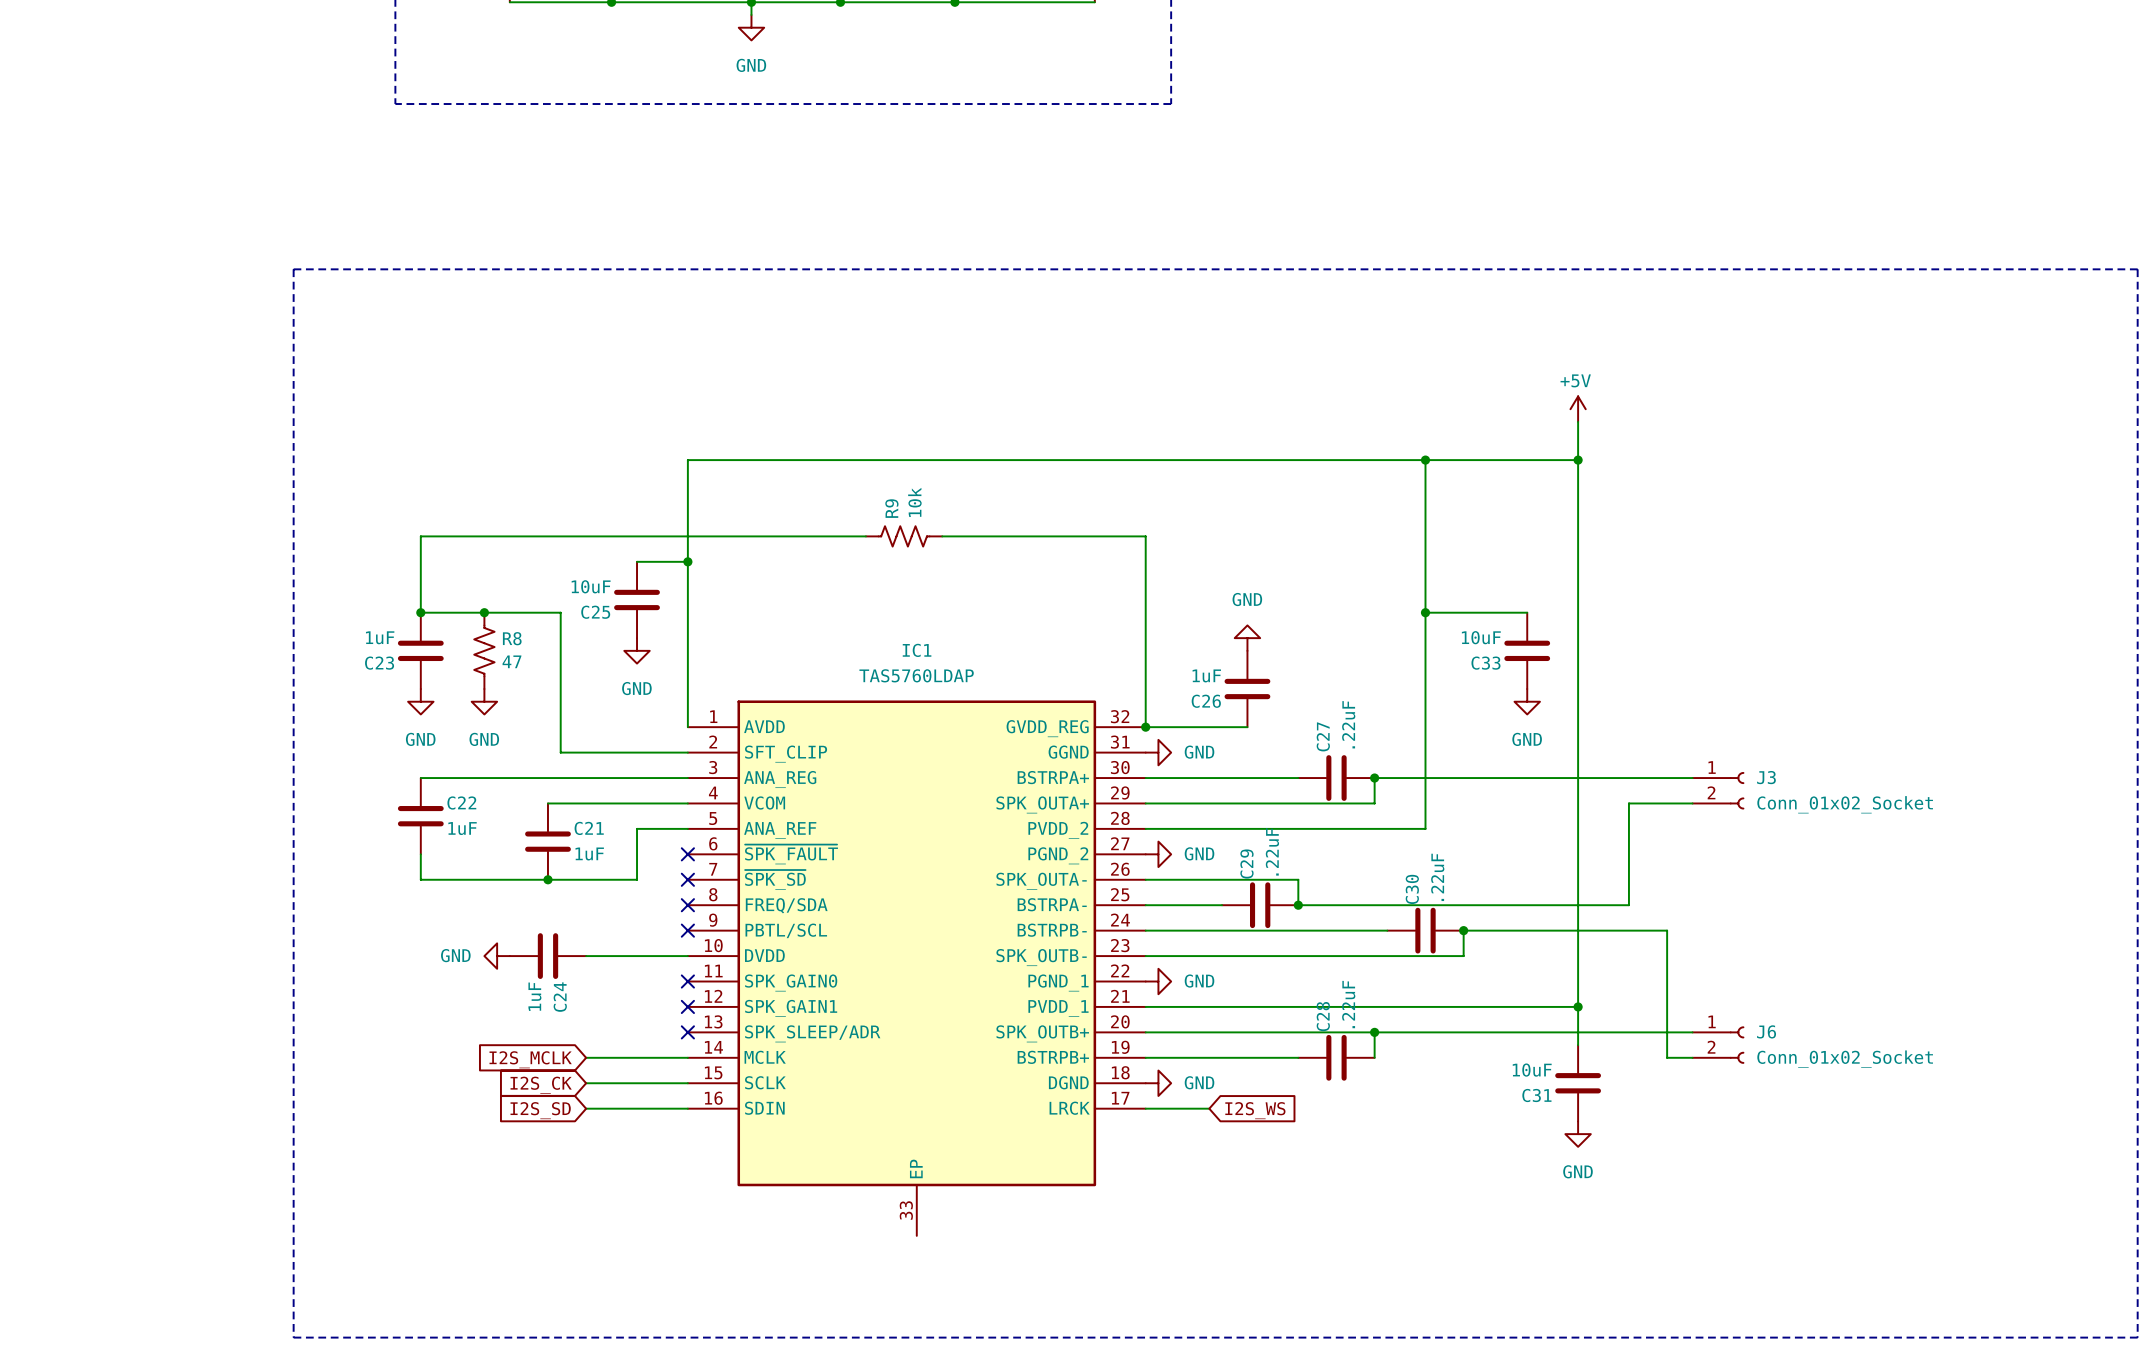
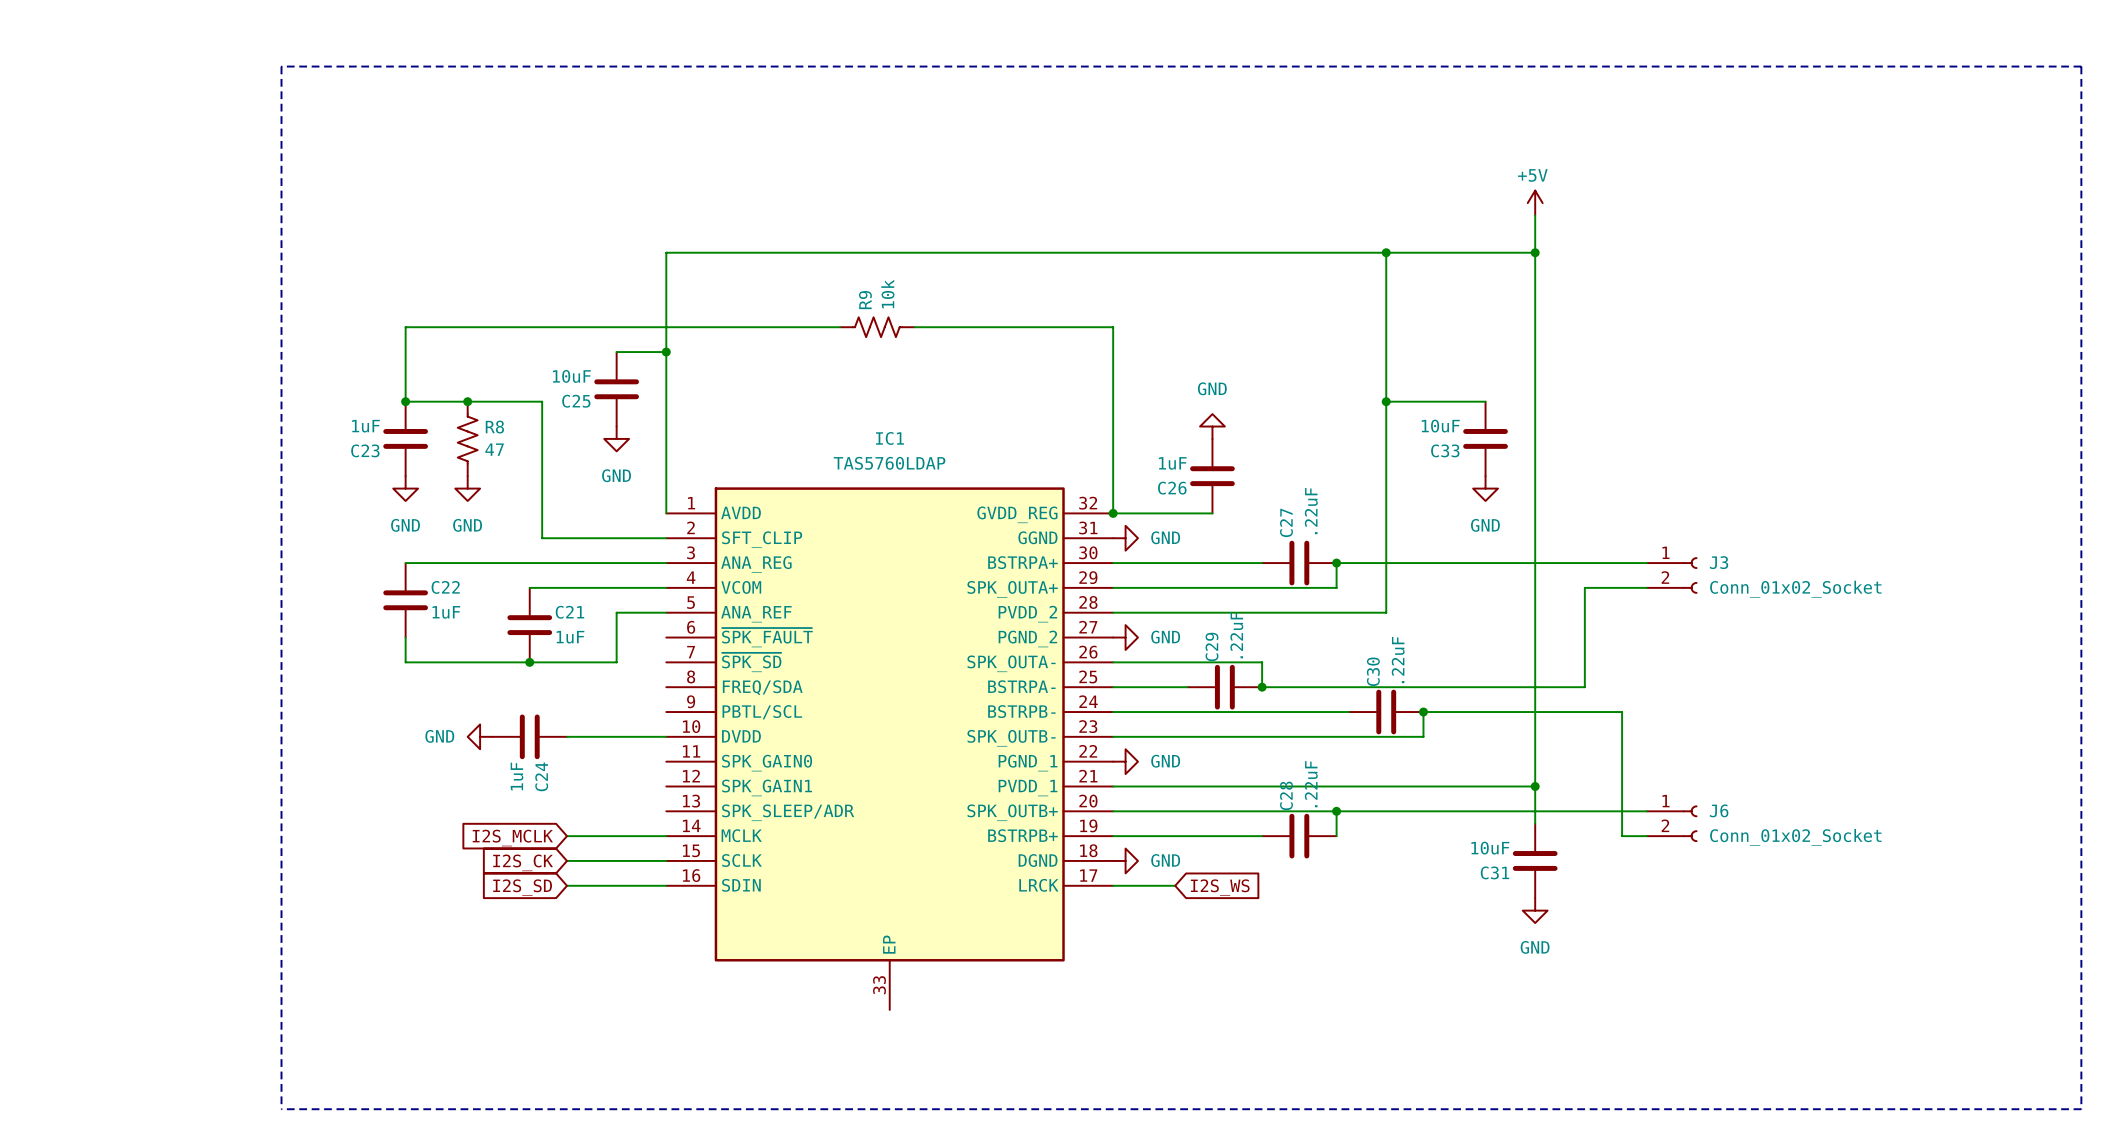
no-connect mark: (687, 854) -> none
no-connect mark: (687, 879) -> none
no-connect mark: (687, 905) -> none
no-connect mark: (687, 930) -> none
no-connect mark: (687, 981) -> none
no-connect mark: (687, 1006) -> none
no-connect mark: (687, 1032) -> none

